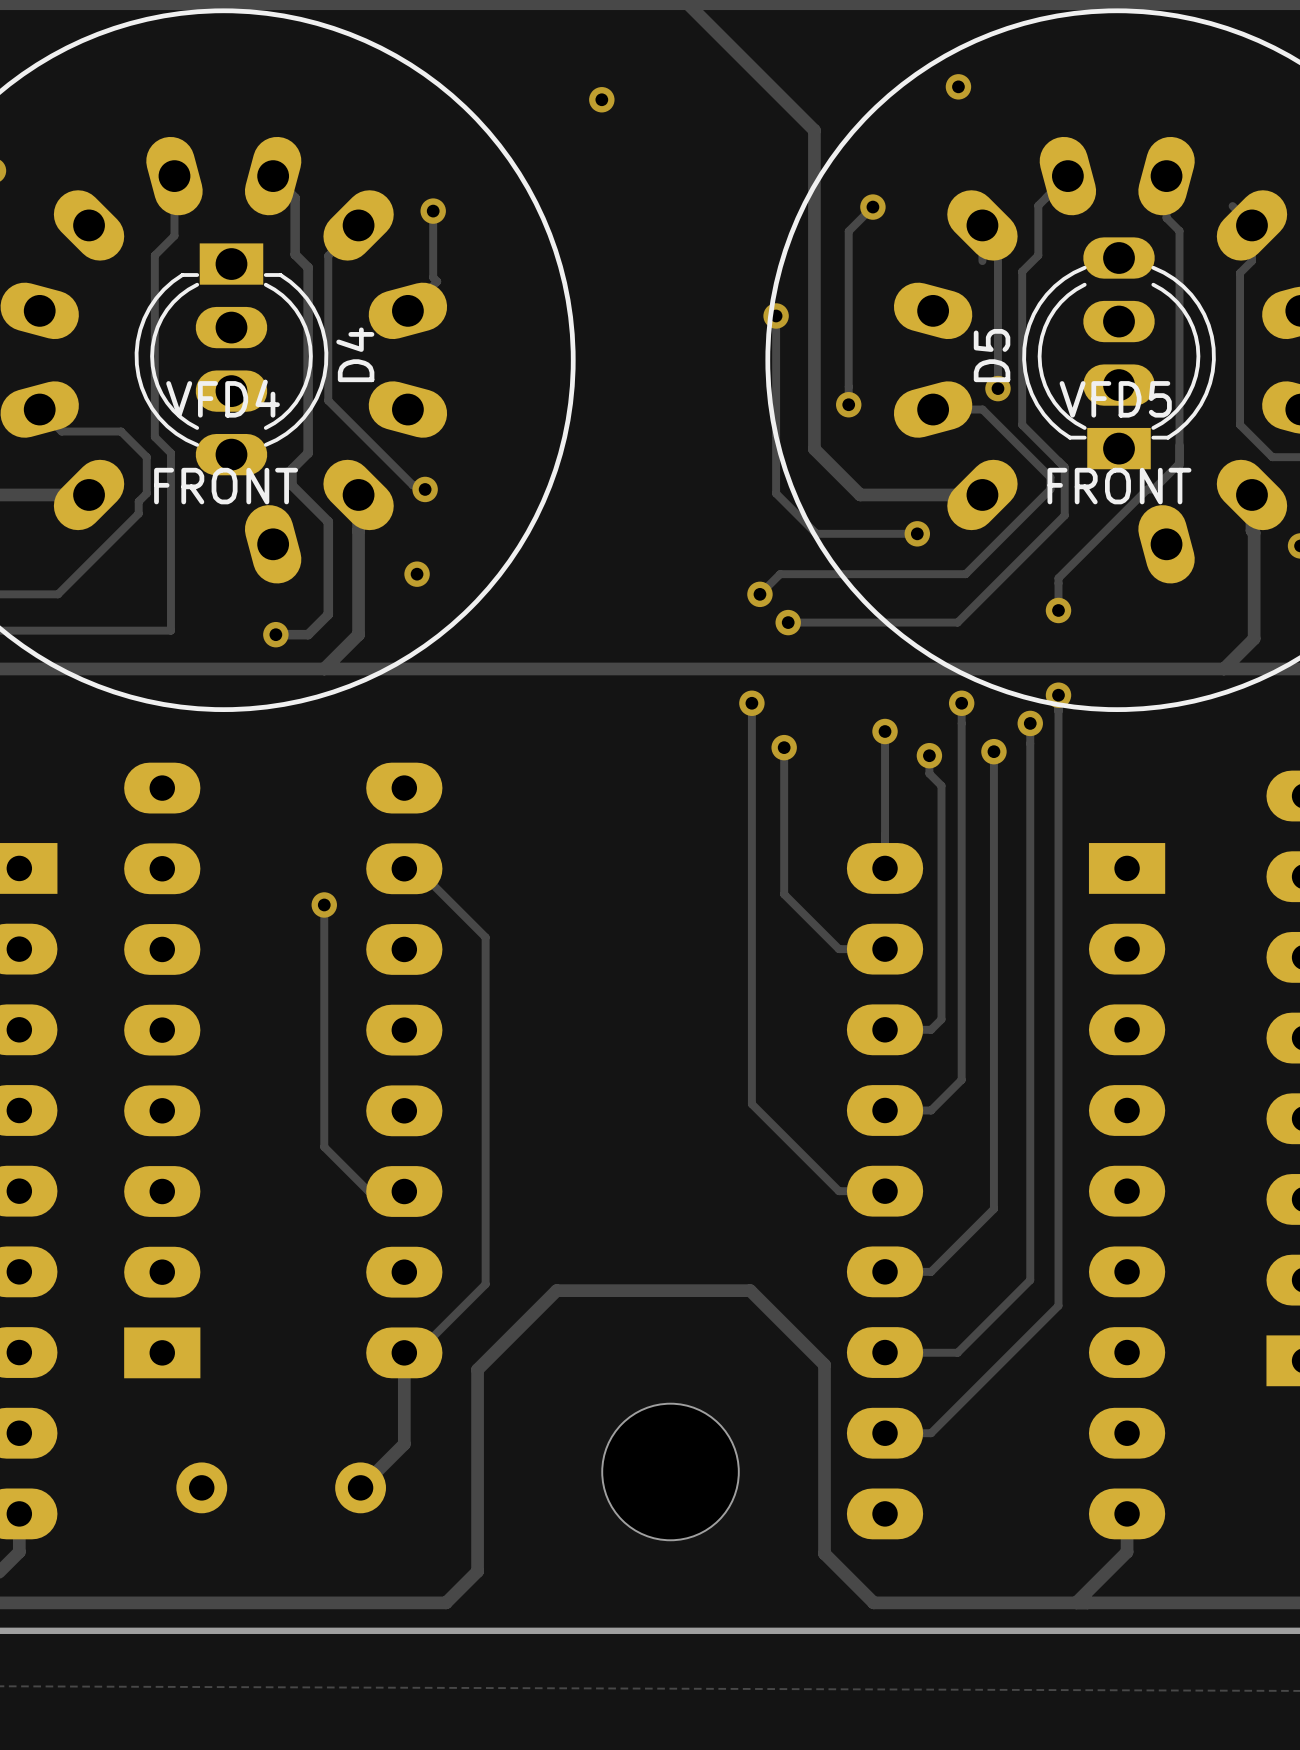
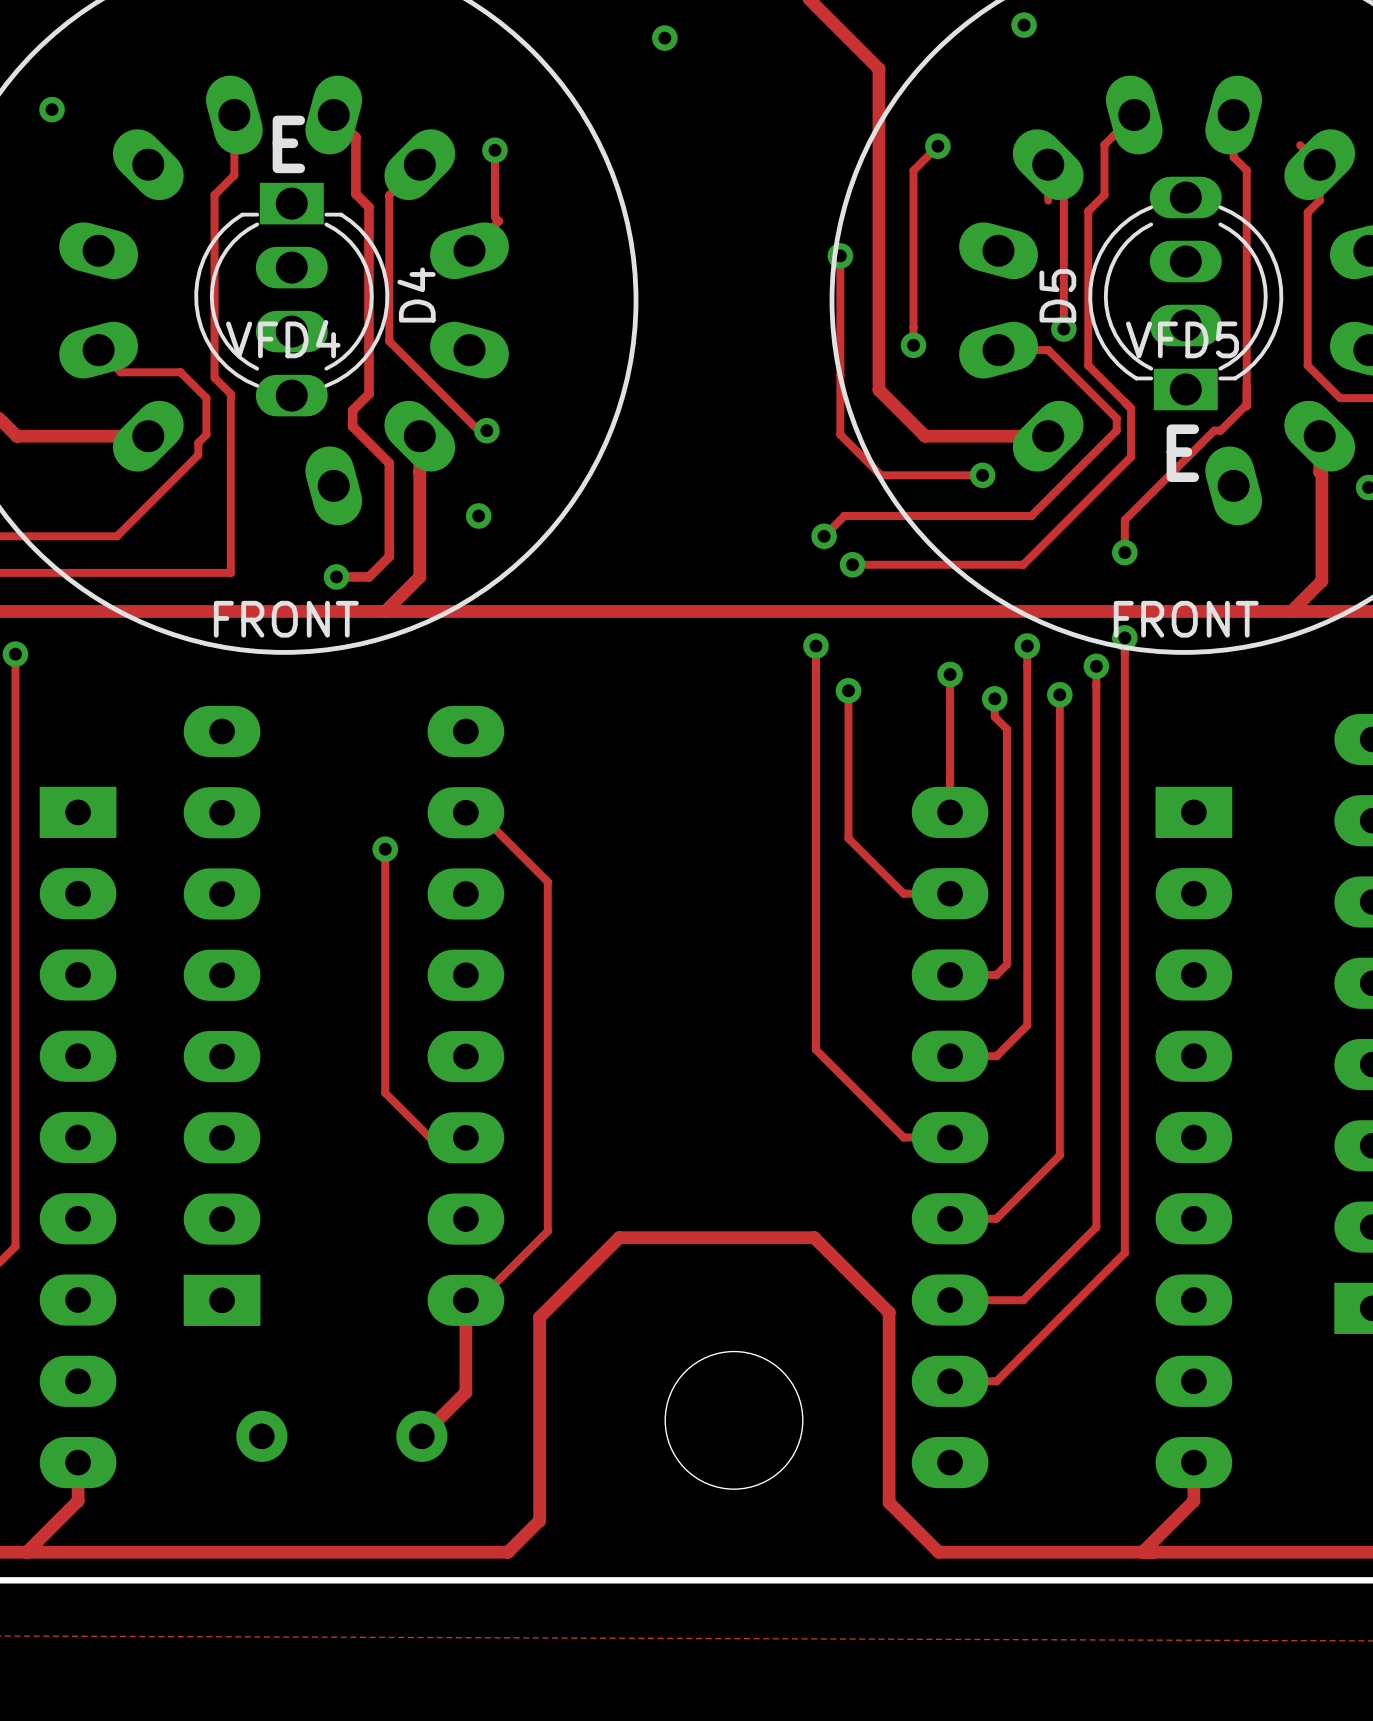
text: none -> E (288, 144)
VFD4 text position: FRONT (226, 486) -> FRONT (286, 619)
VFD5 text position: FRONT (1119, 486) -> FRONT (1186, 619)
text: none -> E (1182, 453)

